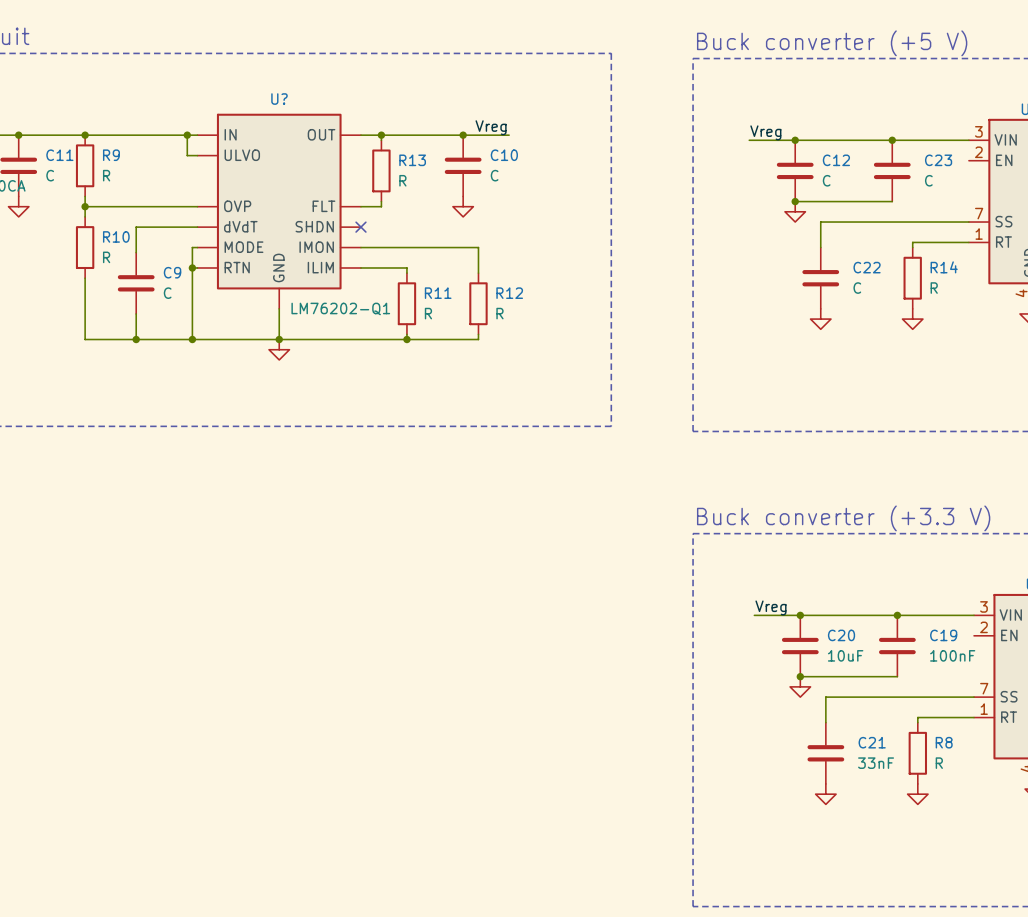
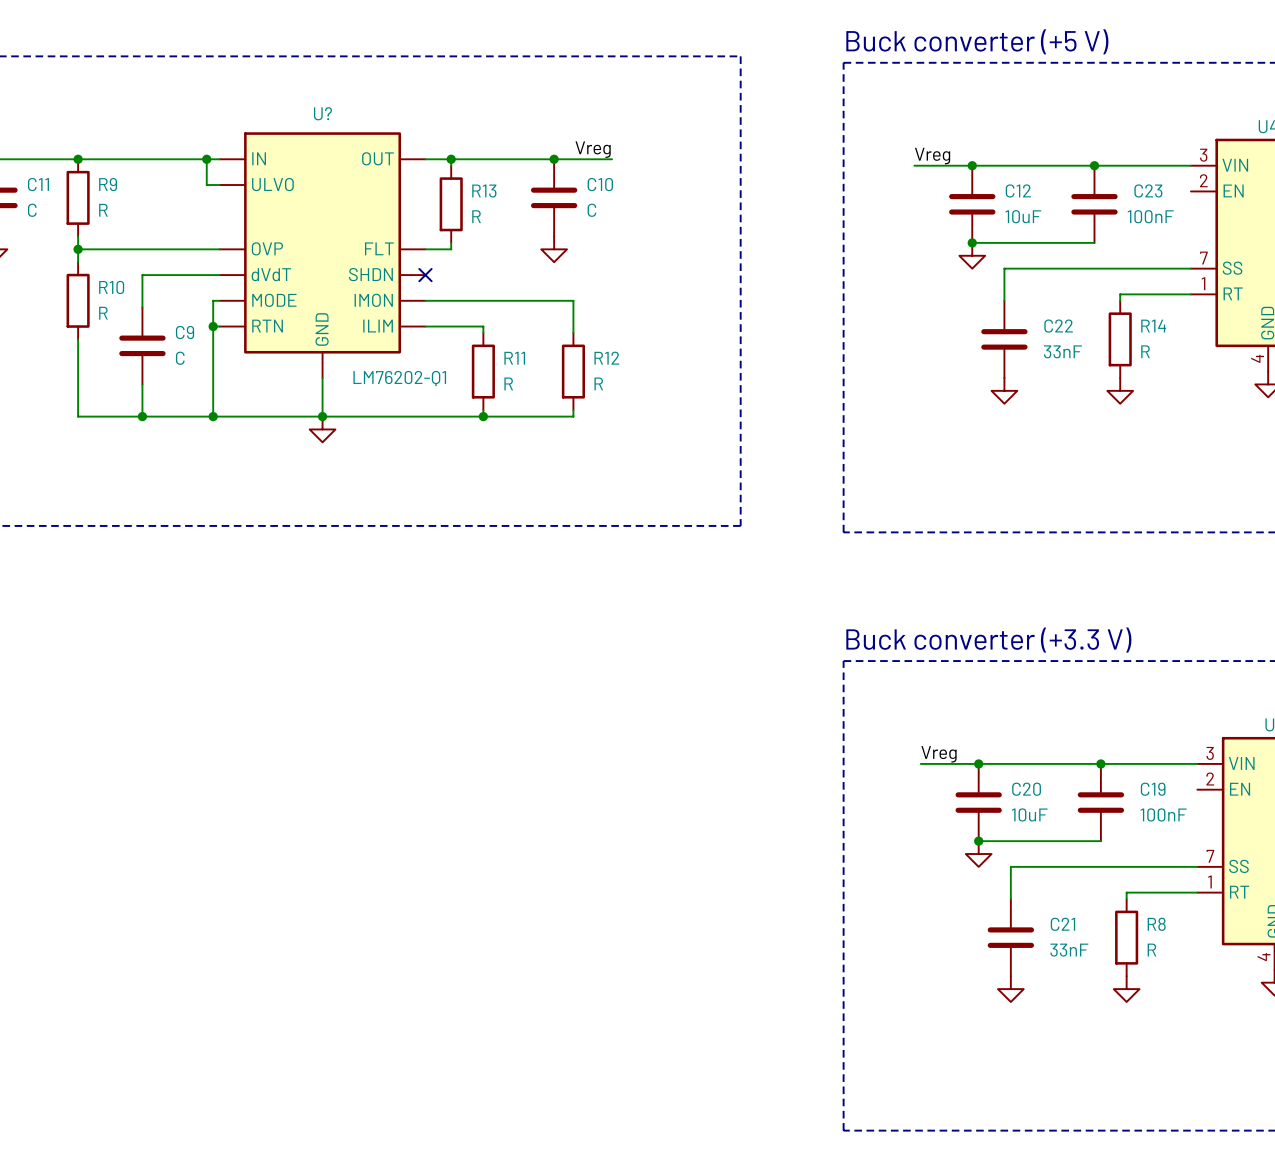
C12 value: C (826, 180) -> 10uF (1023, 216)
C23 value: C (928, 180) -> 100nF (1150, 216)
C22 value: C (857, 288) -> 33nF (1062, 351)

